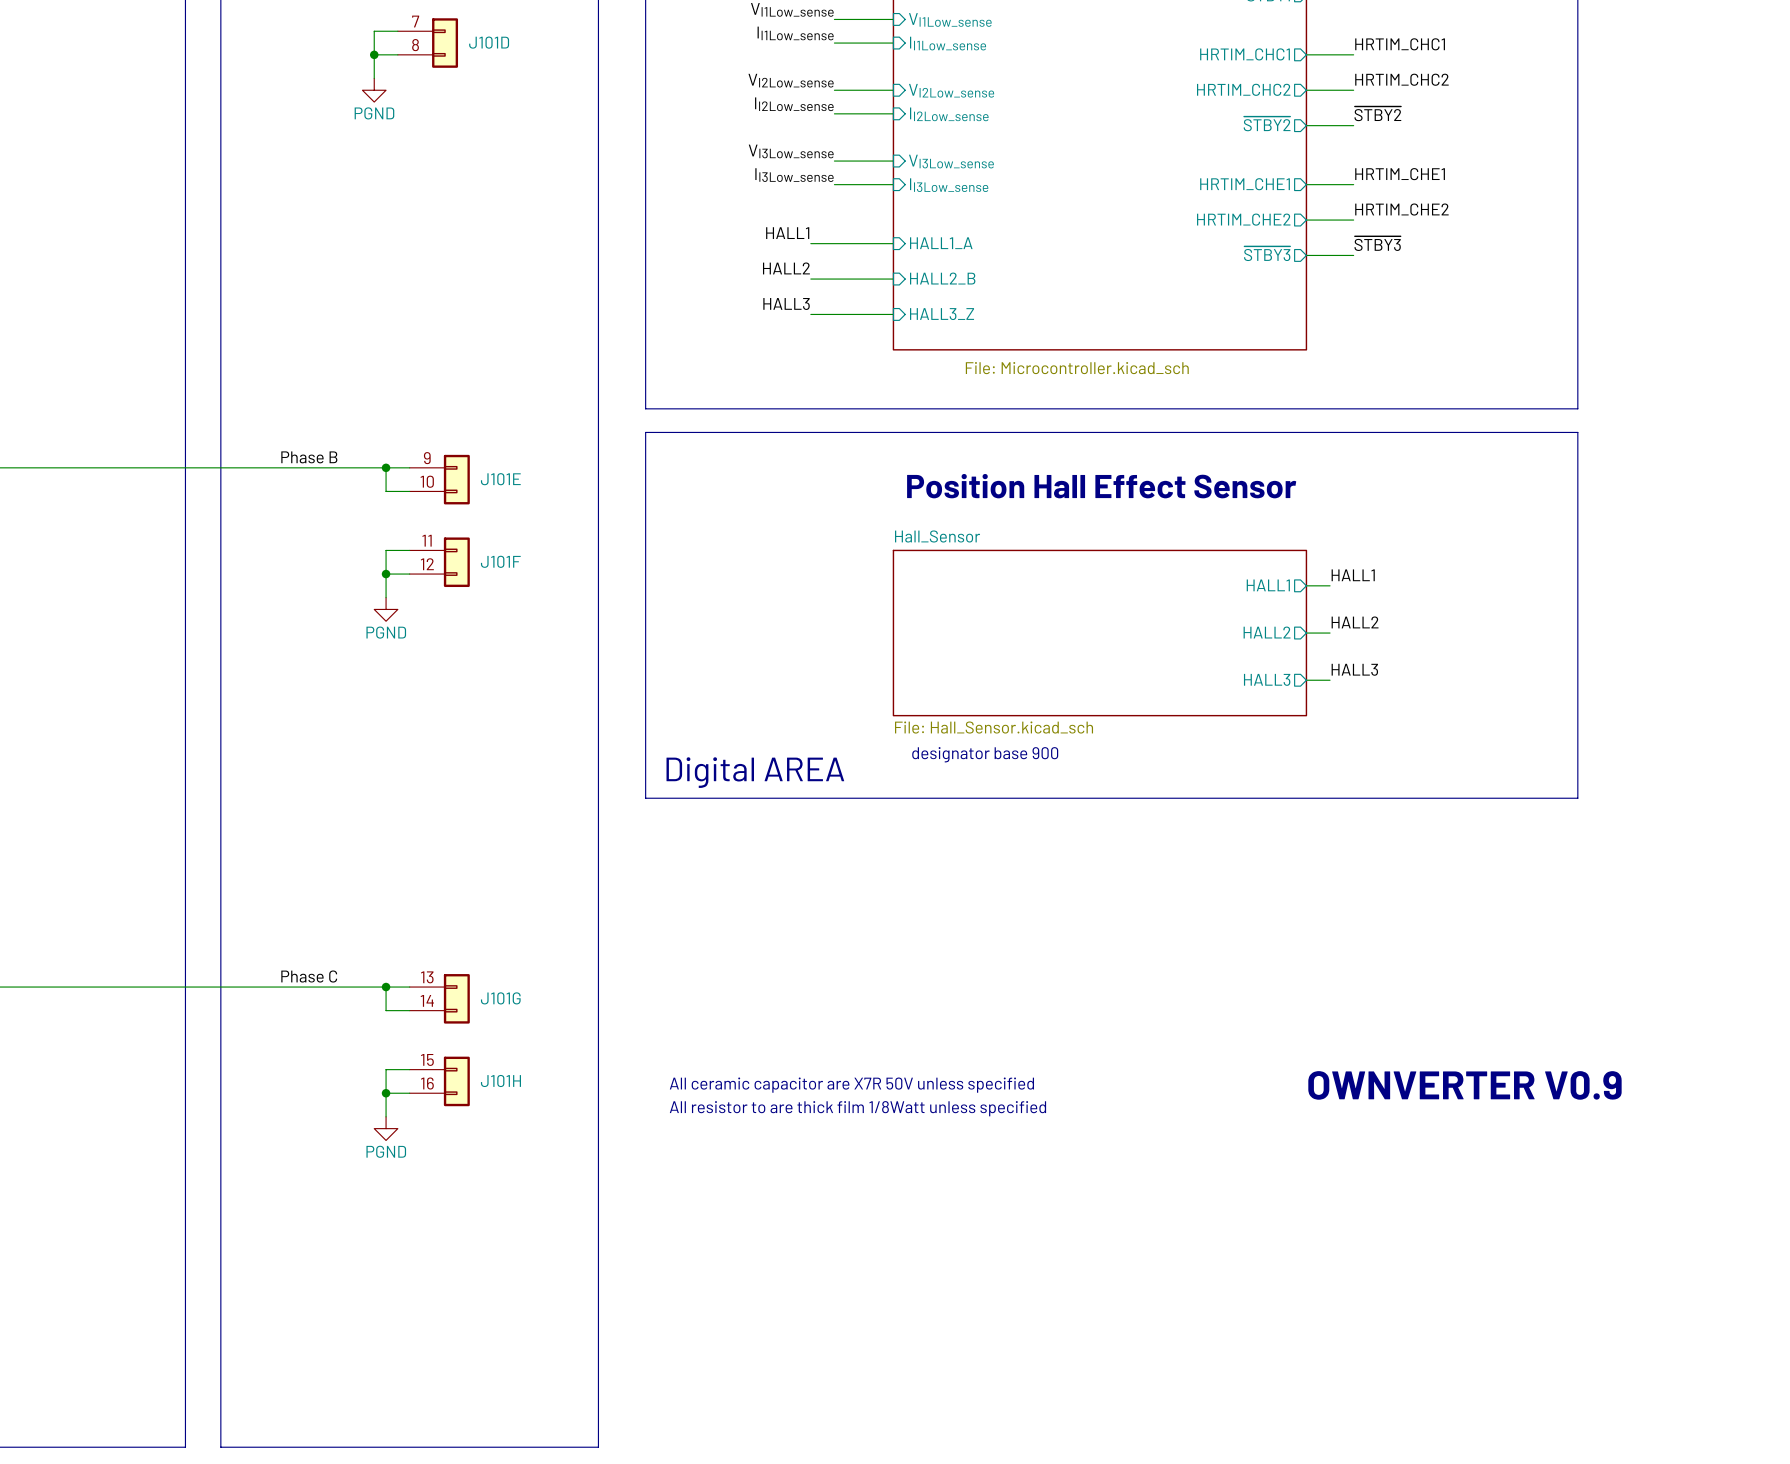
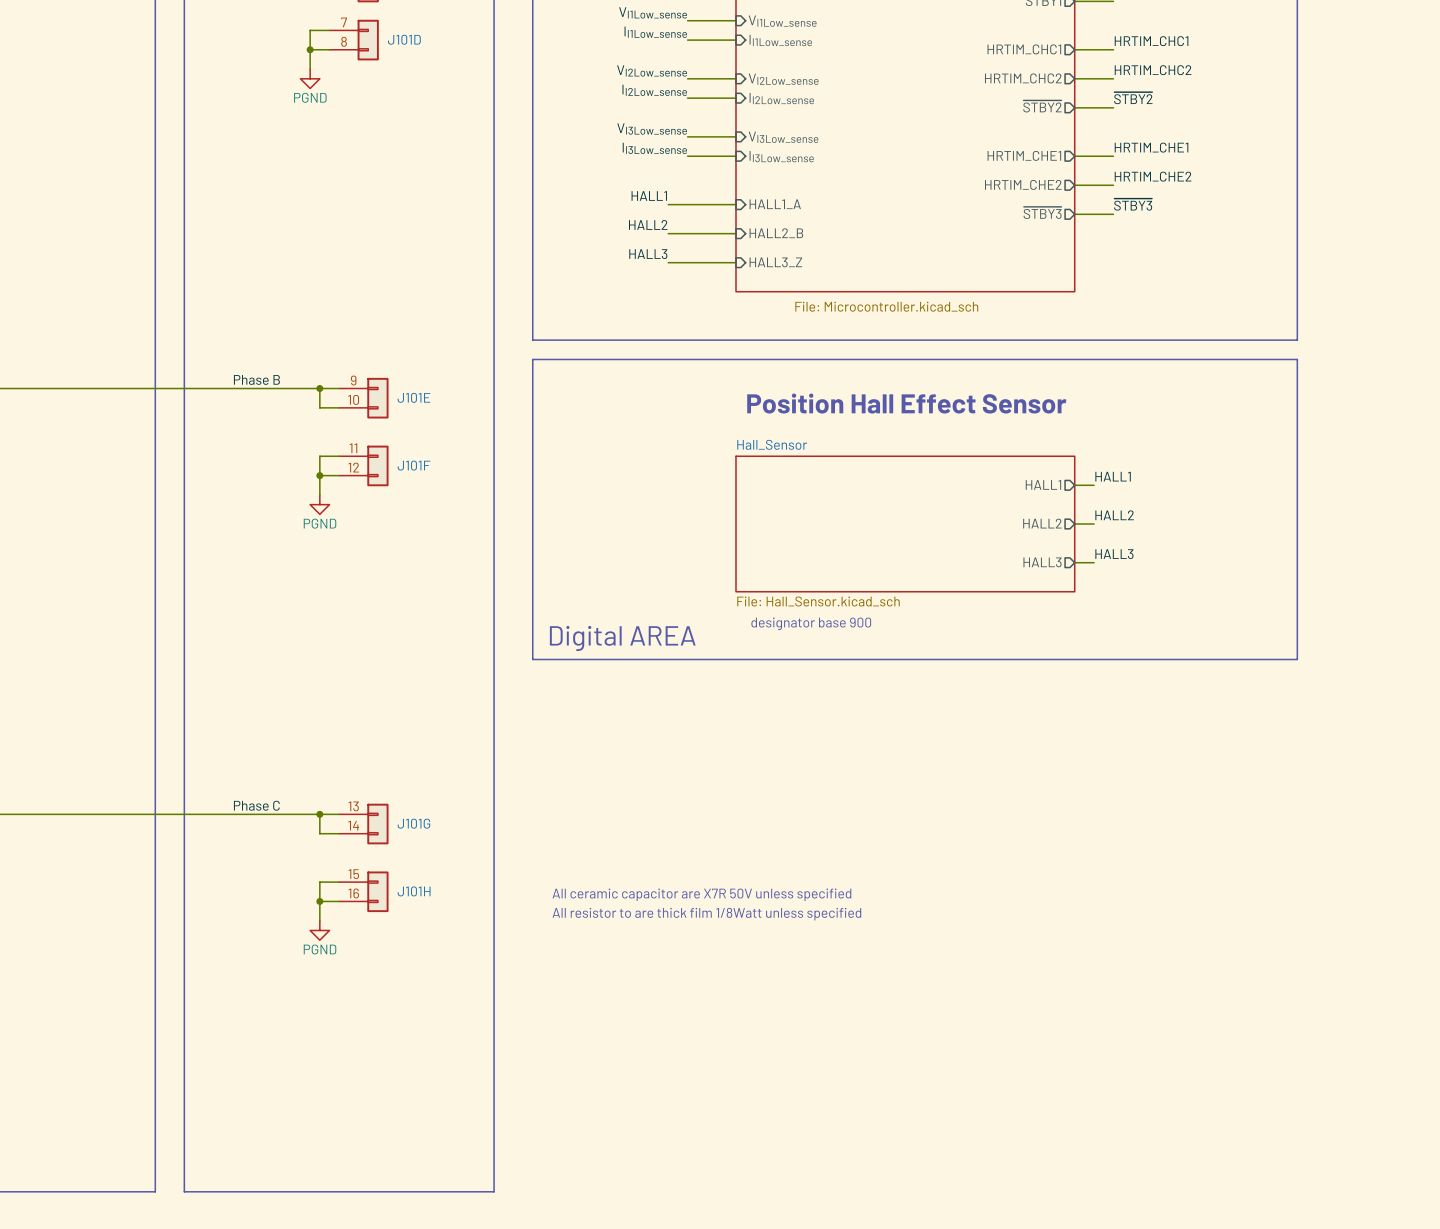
text: OWNVERTER V0.9 (1464, 1085) -> none

